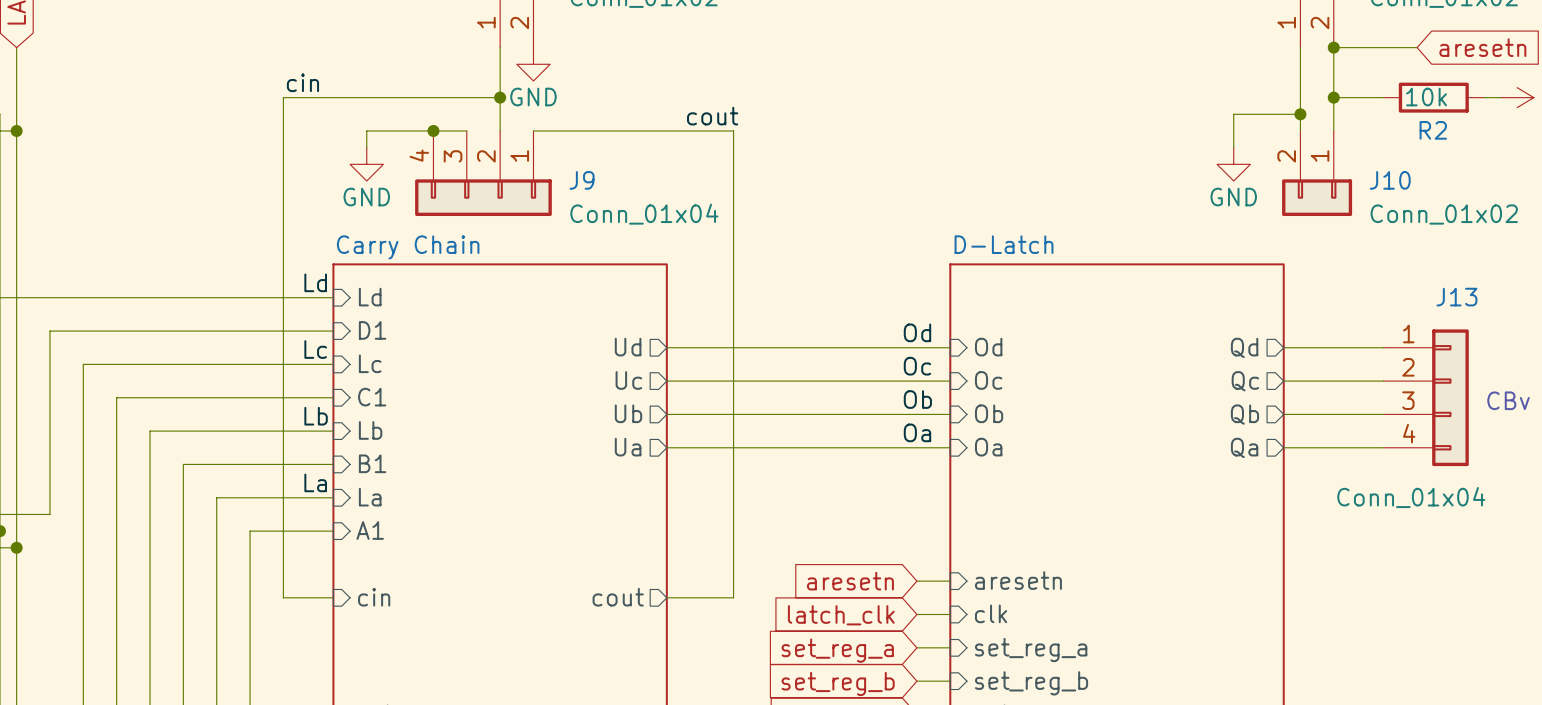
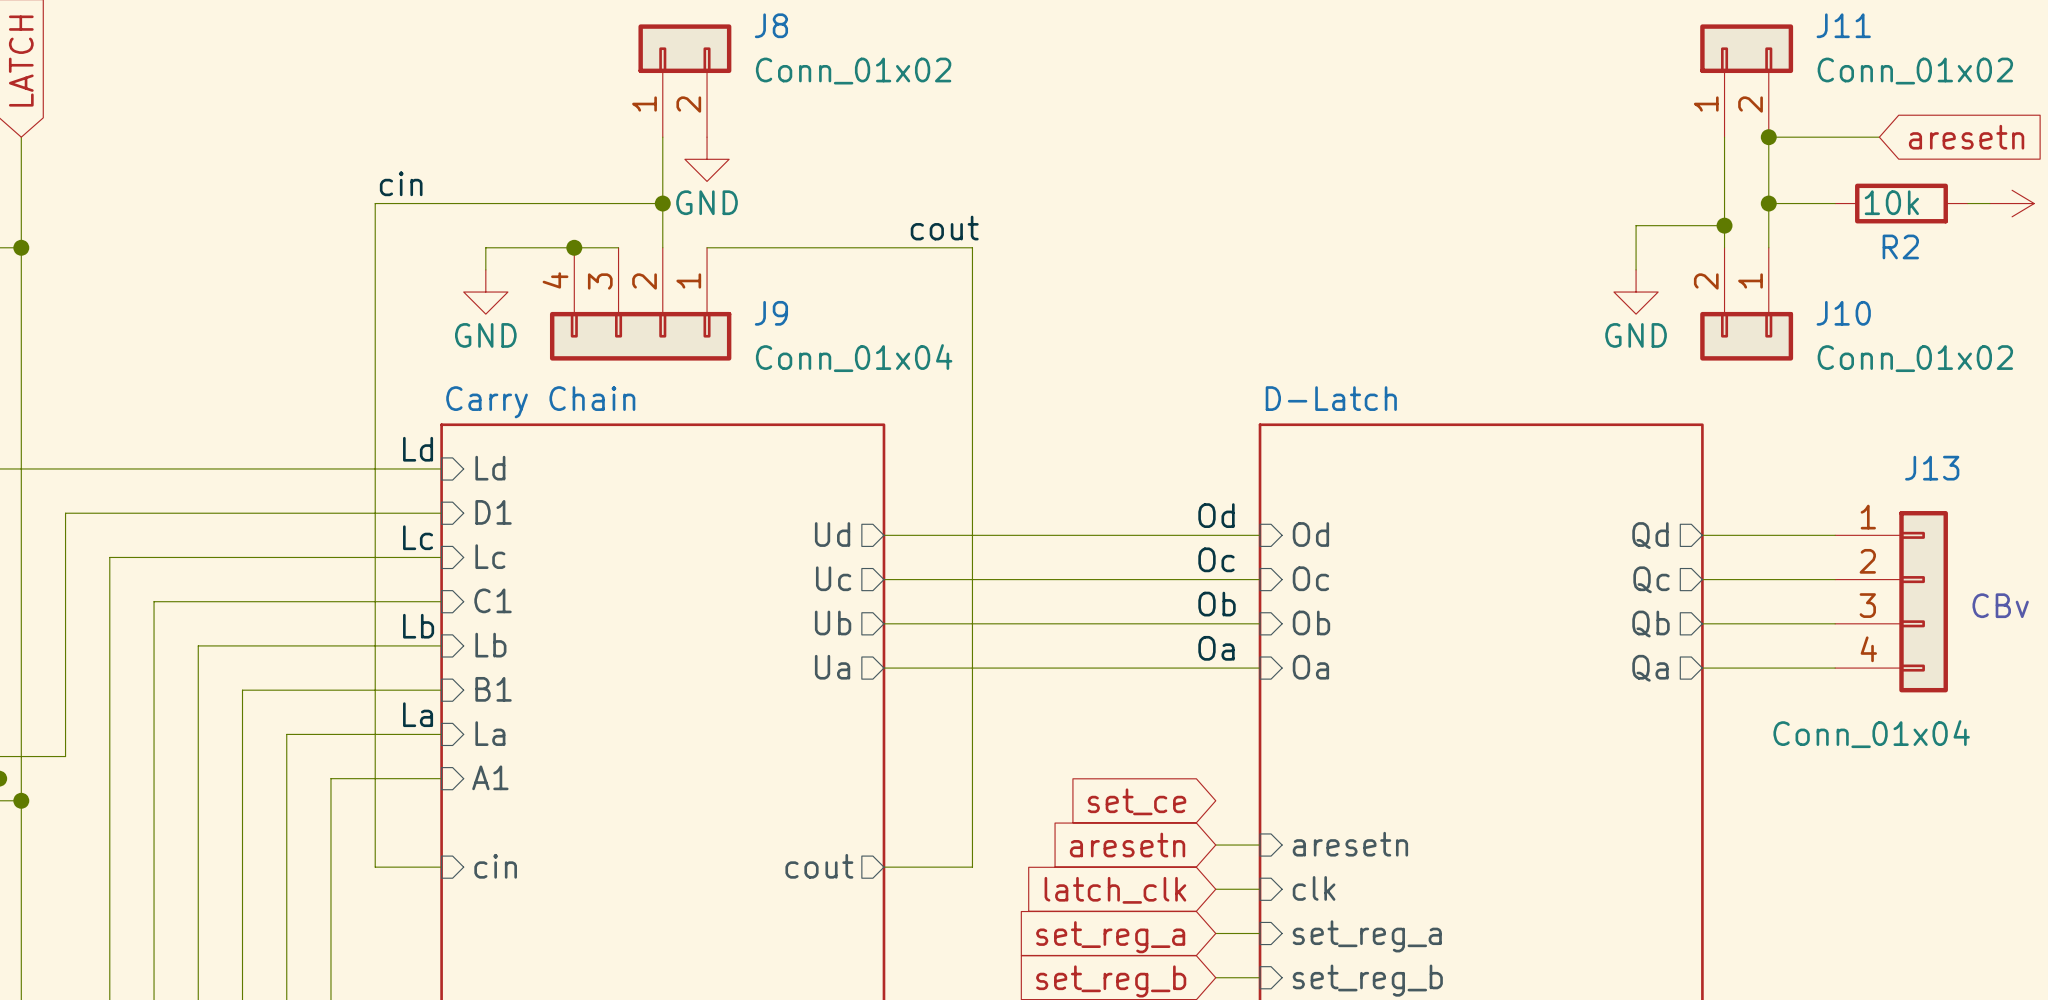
global label: none -> set_ce (1137, 801)

